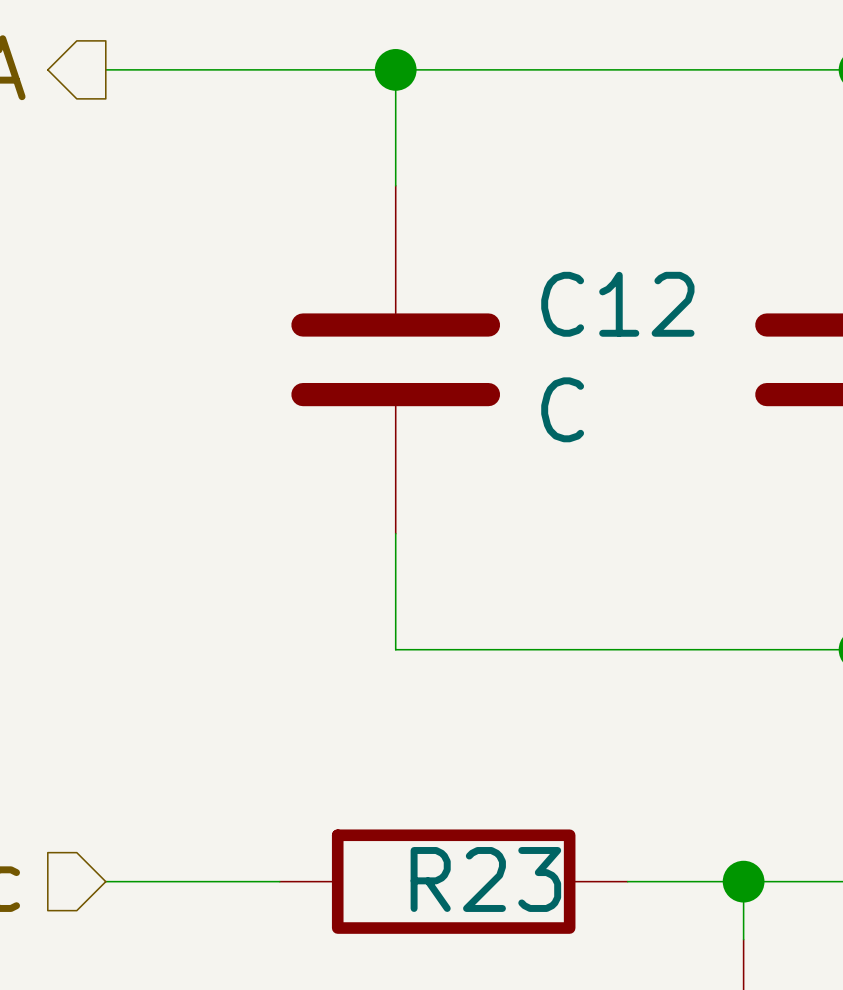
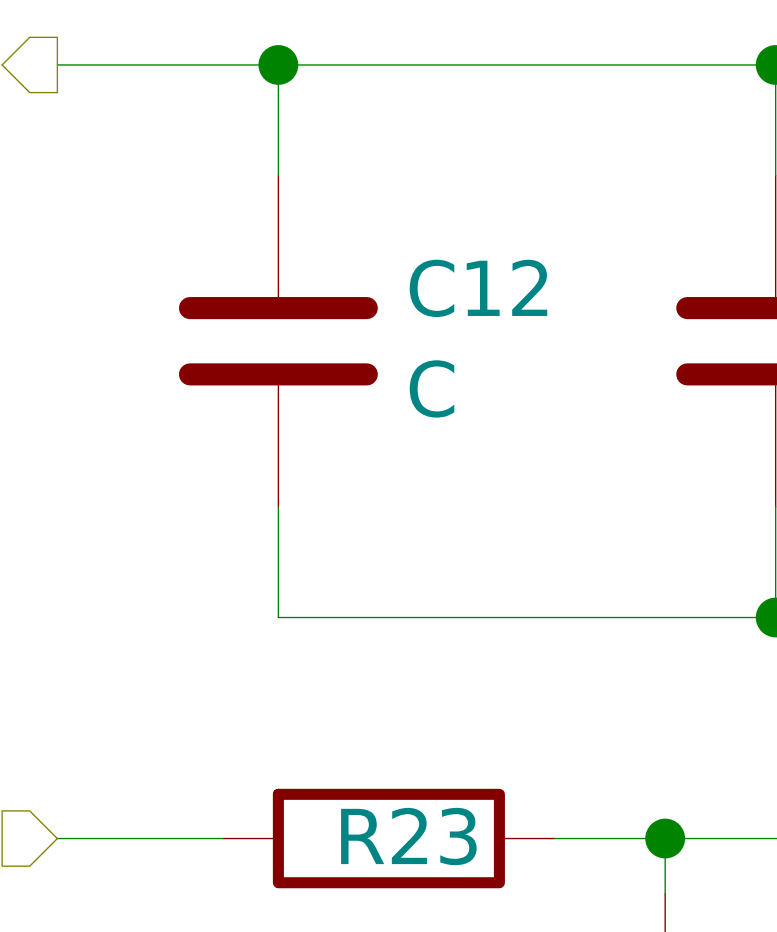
wire: (395, 69) (395, 185) -> (278, 64) (278, 175)
junction position: (395, 69) -> (278, 64)
C12 position: (395, 359) -> (278, 341)
wire: (395, 533) (395, 649) -> (278, 507) (278, 617) (333, 617)

